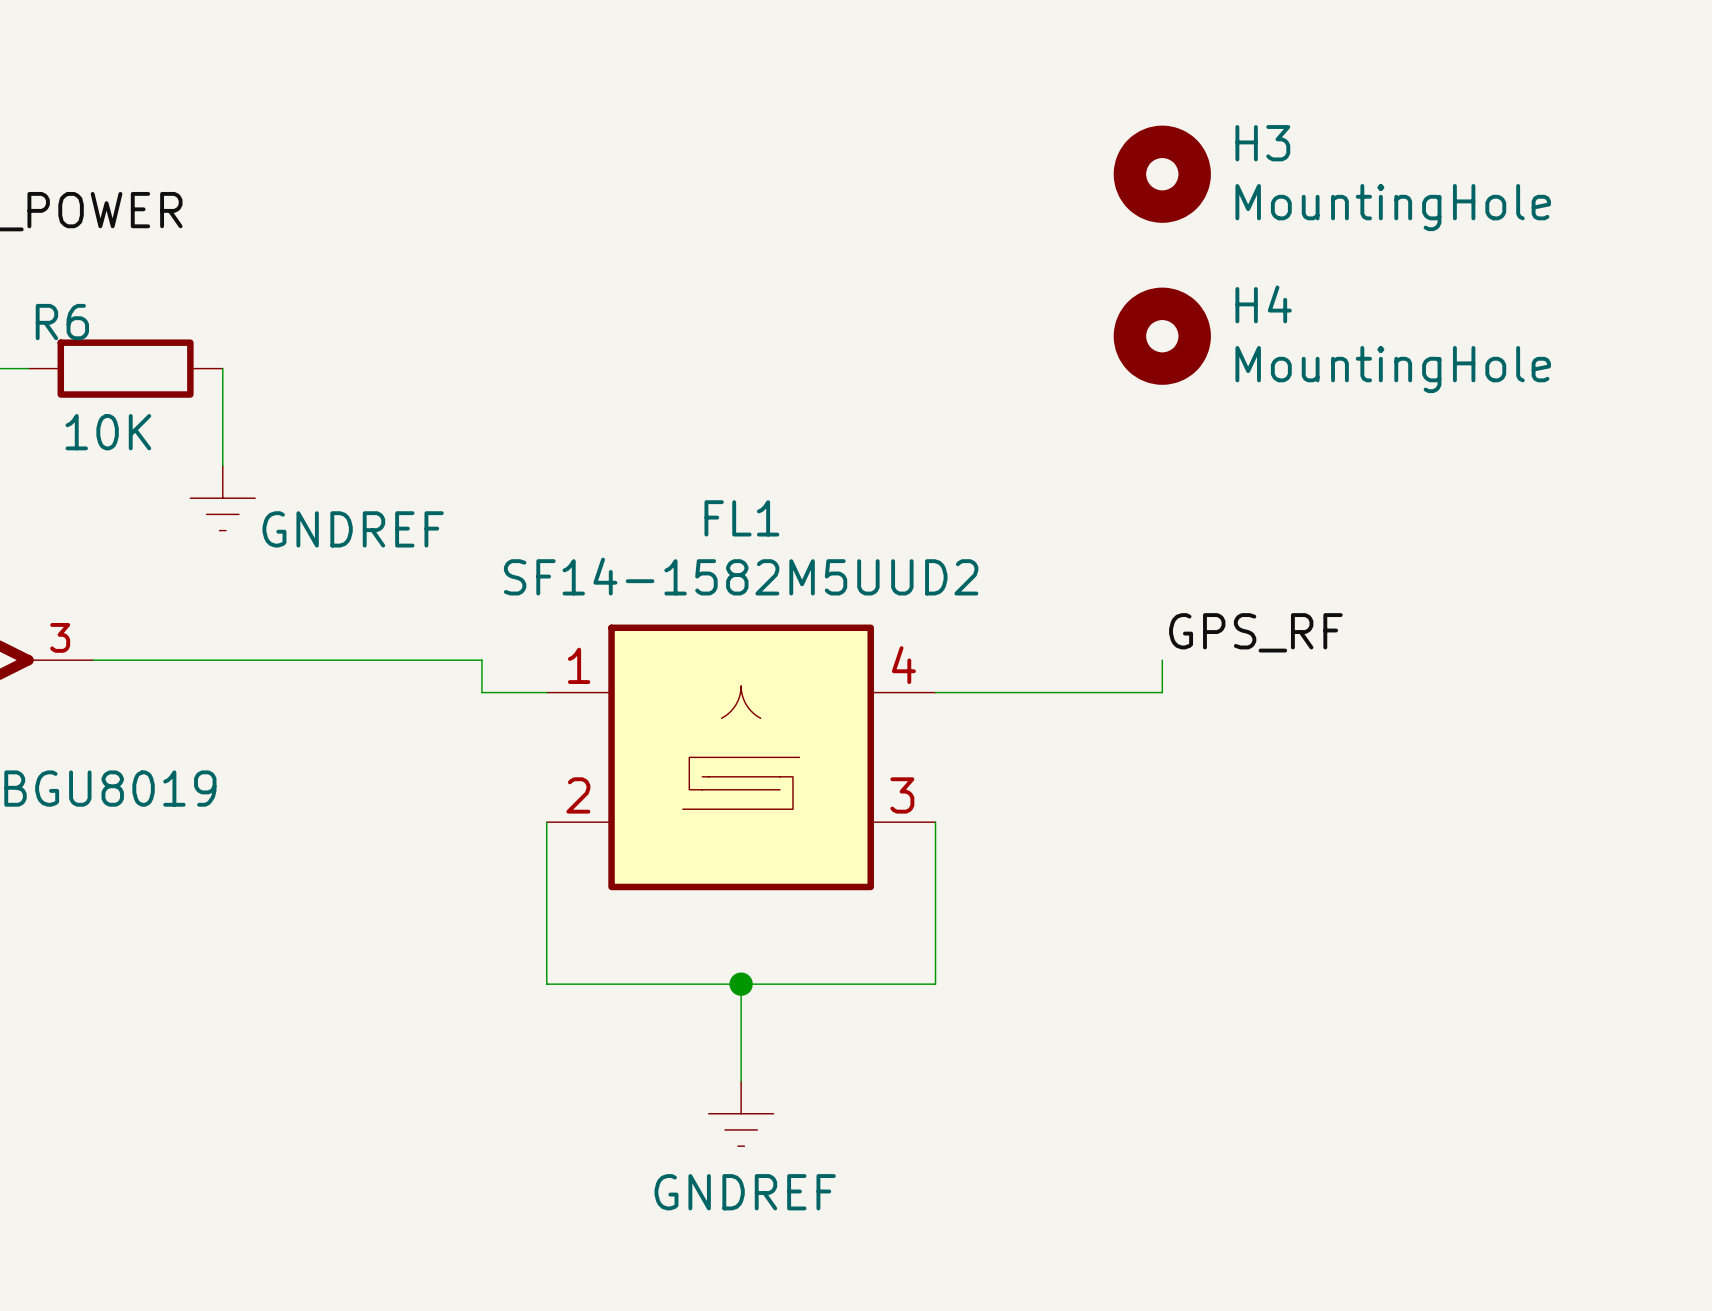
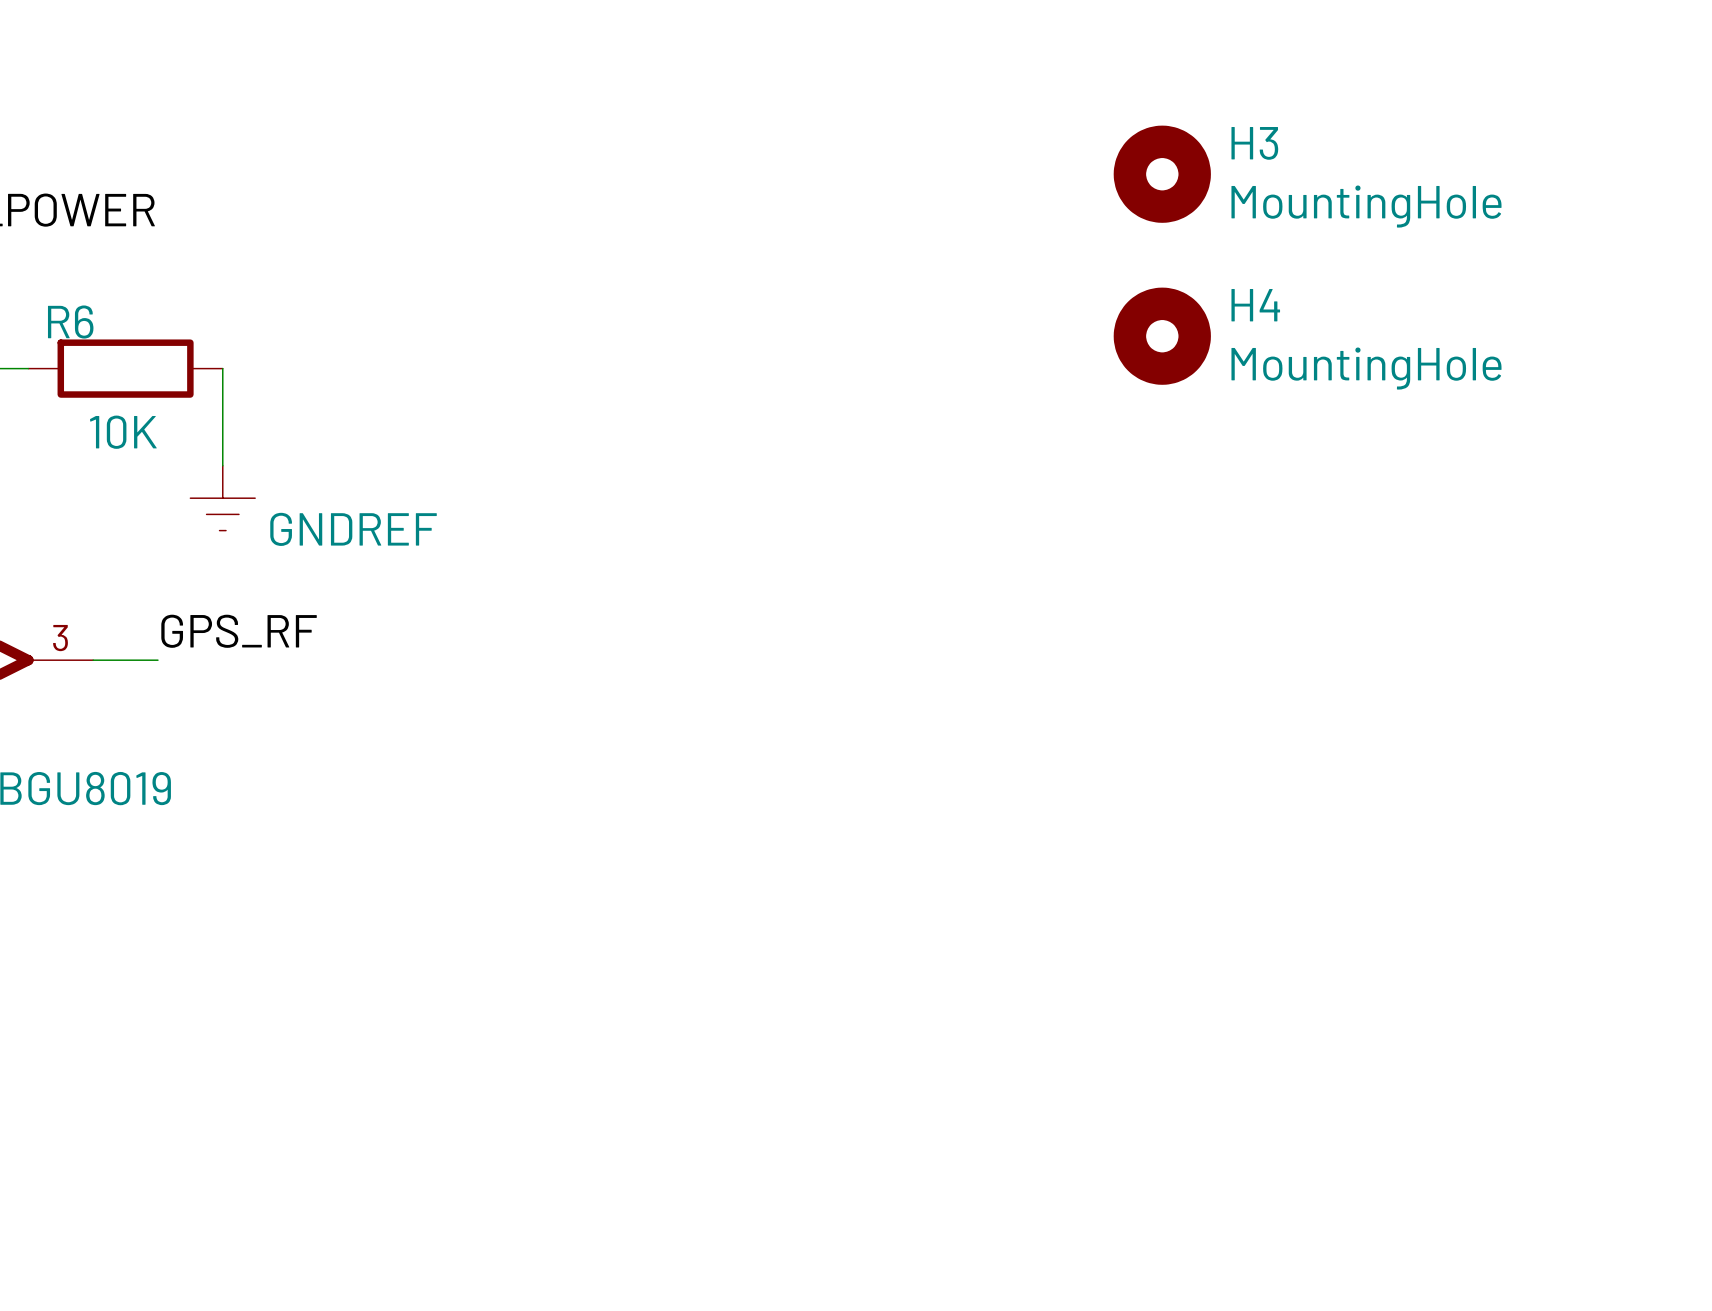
label: none -> GPS_RF (239, 631)
label: GPS_RF (1255, 632) -> none
wire: (157, 660) (481, 660) (481, 692) (546, 692) -> none
wire: (1162, 660) (1162, 692) (935, 692) -> none
FL1: SF14-1582M5UUD2 (741, 757) -> none
wire: (546, 822) (546, 984) (935, 984) (935, 822) -> none
wire: (741, 984) (741, 1081) -> none
junction: (741, 984) -> none
power symbol: GNDREF (741, 1113) -> none

